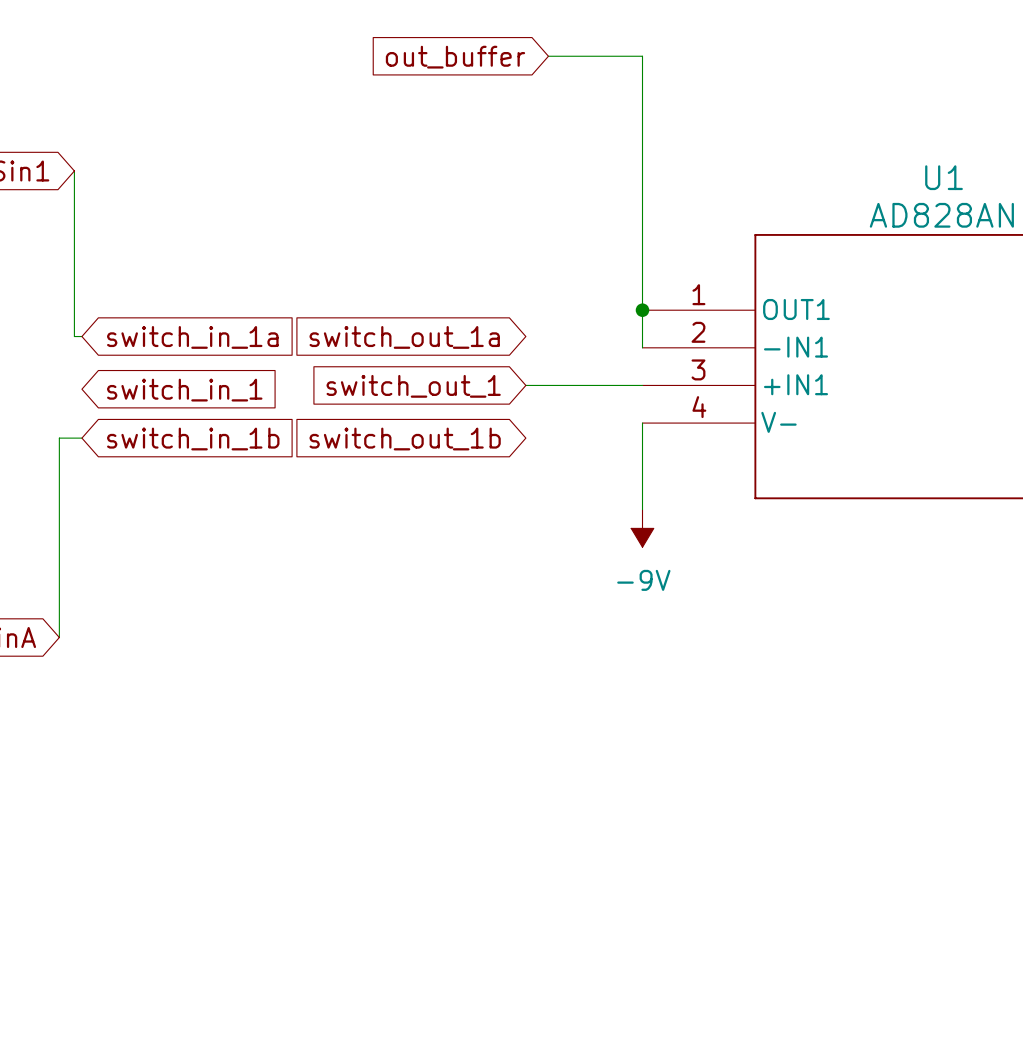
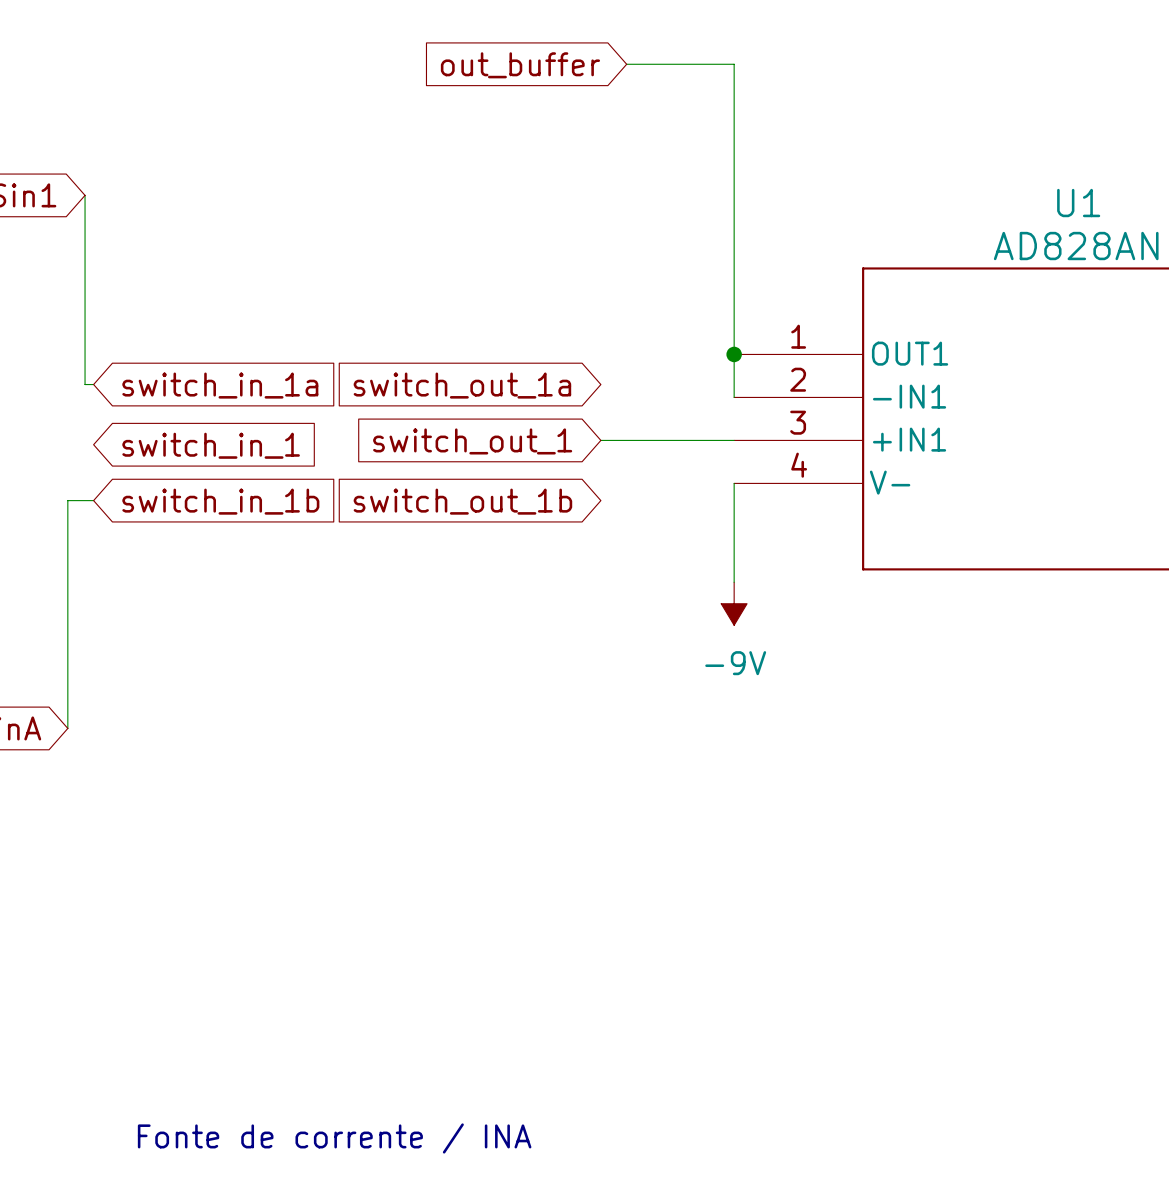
text: none -> Fonte de corrente / INA (334, 1138)

